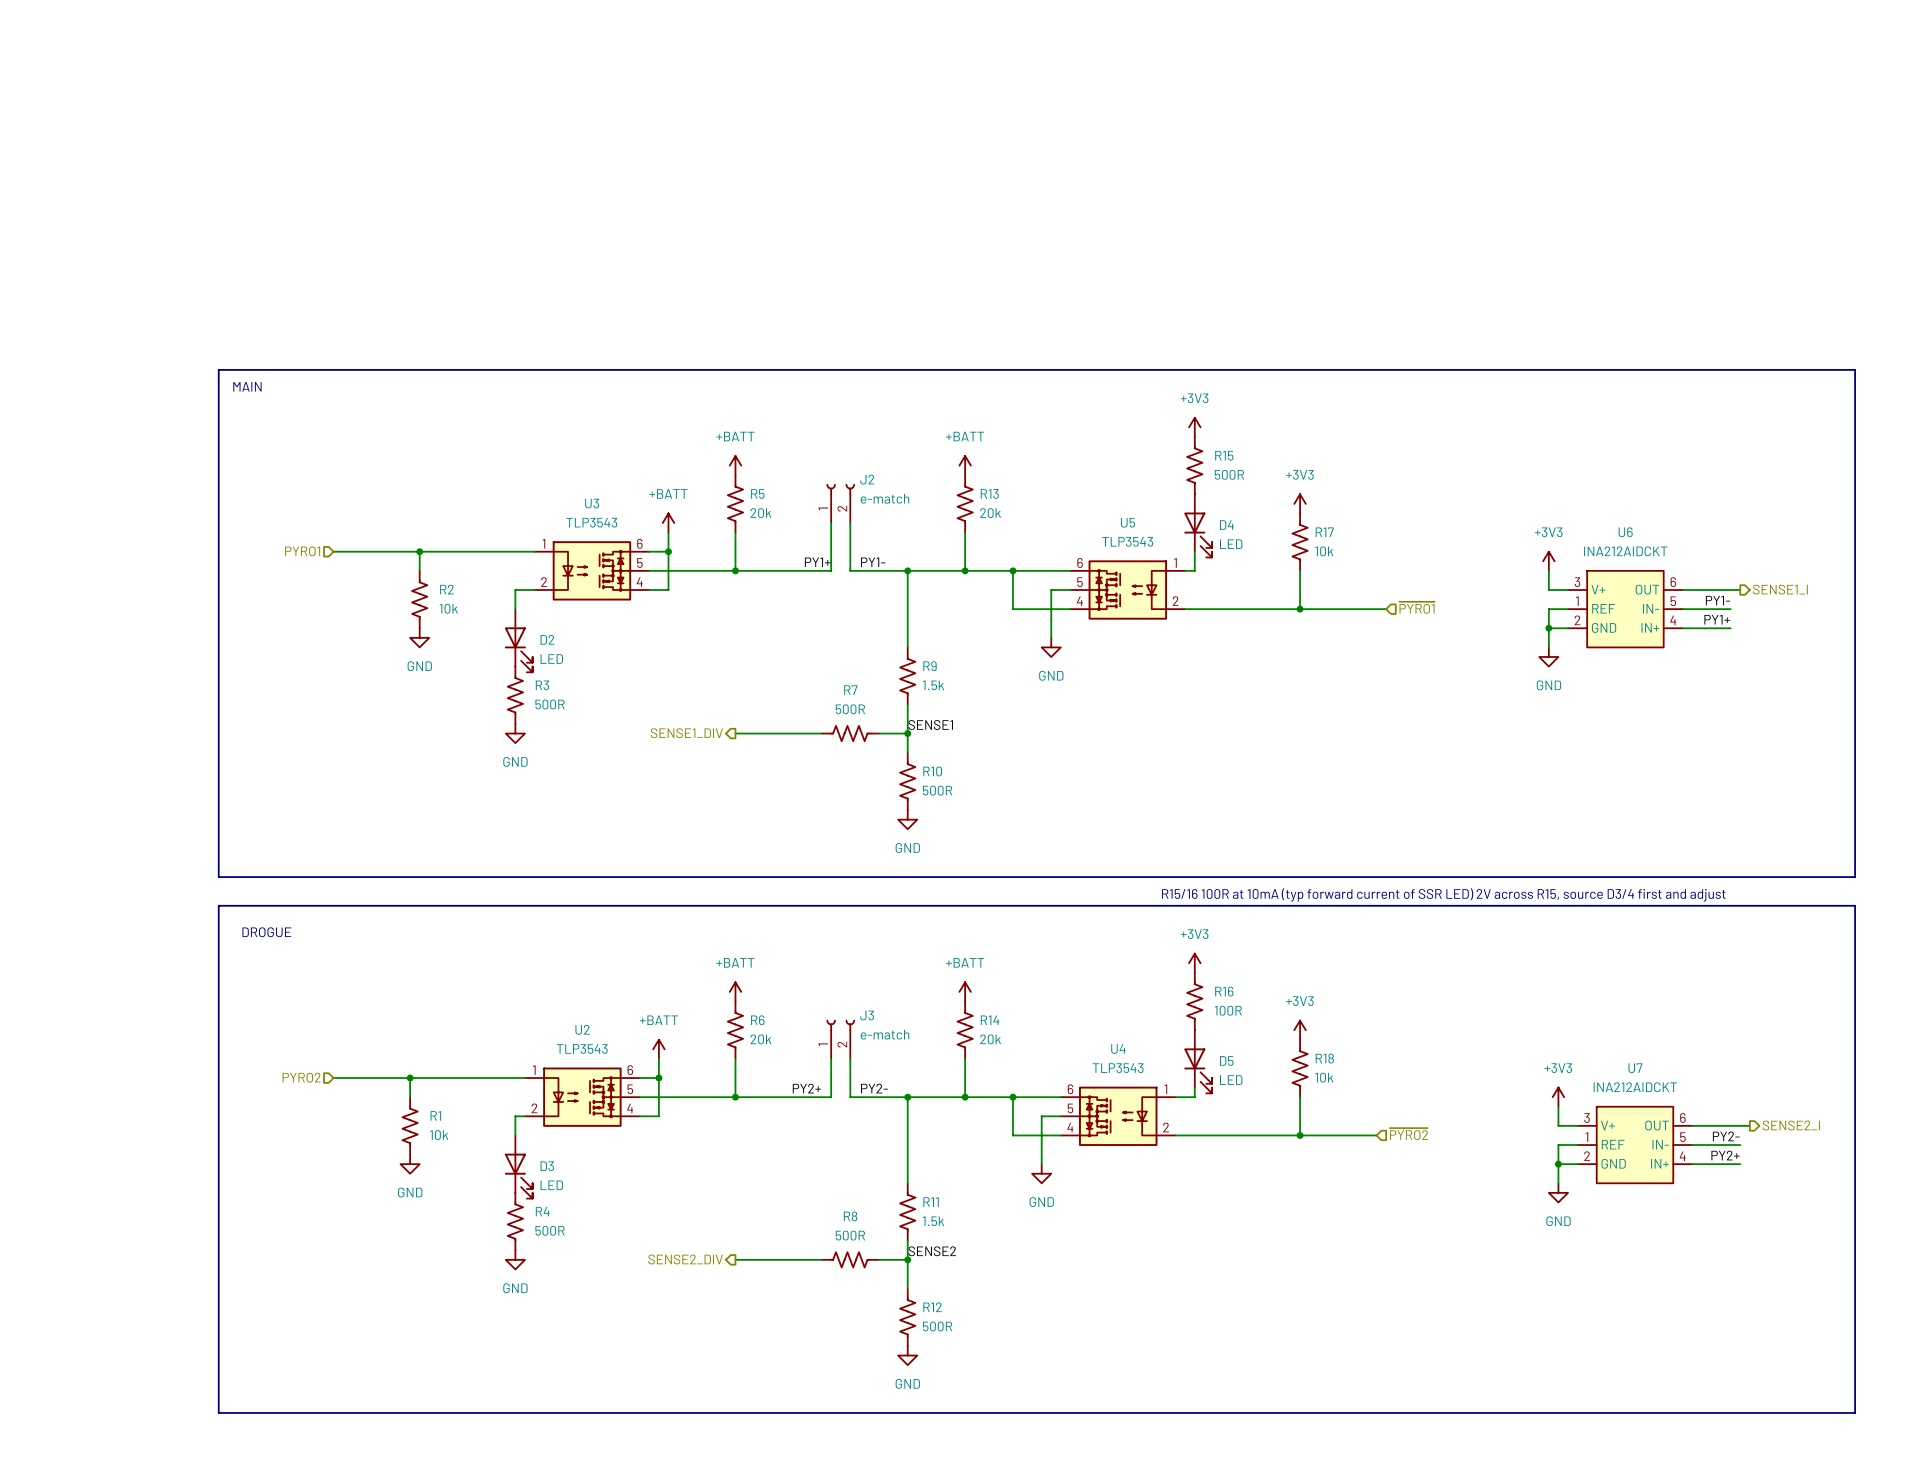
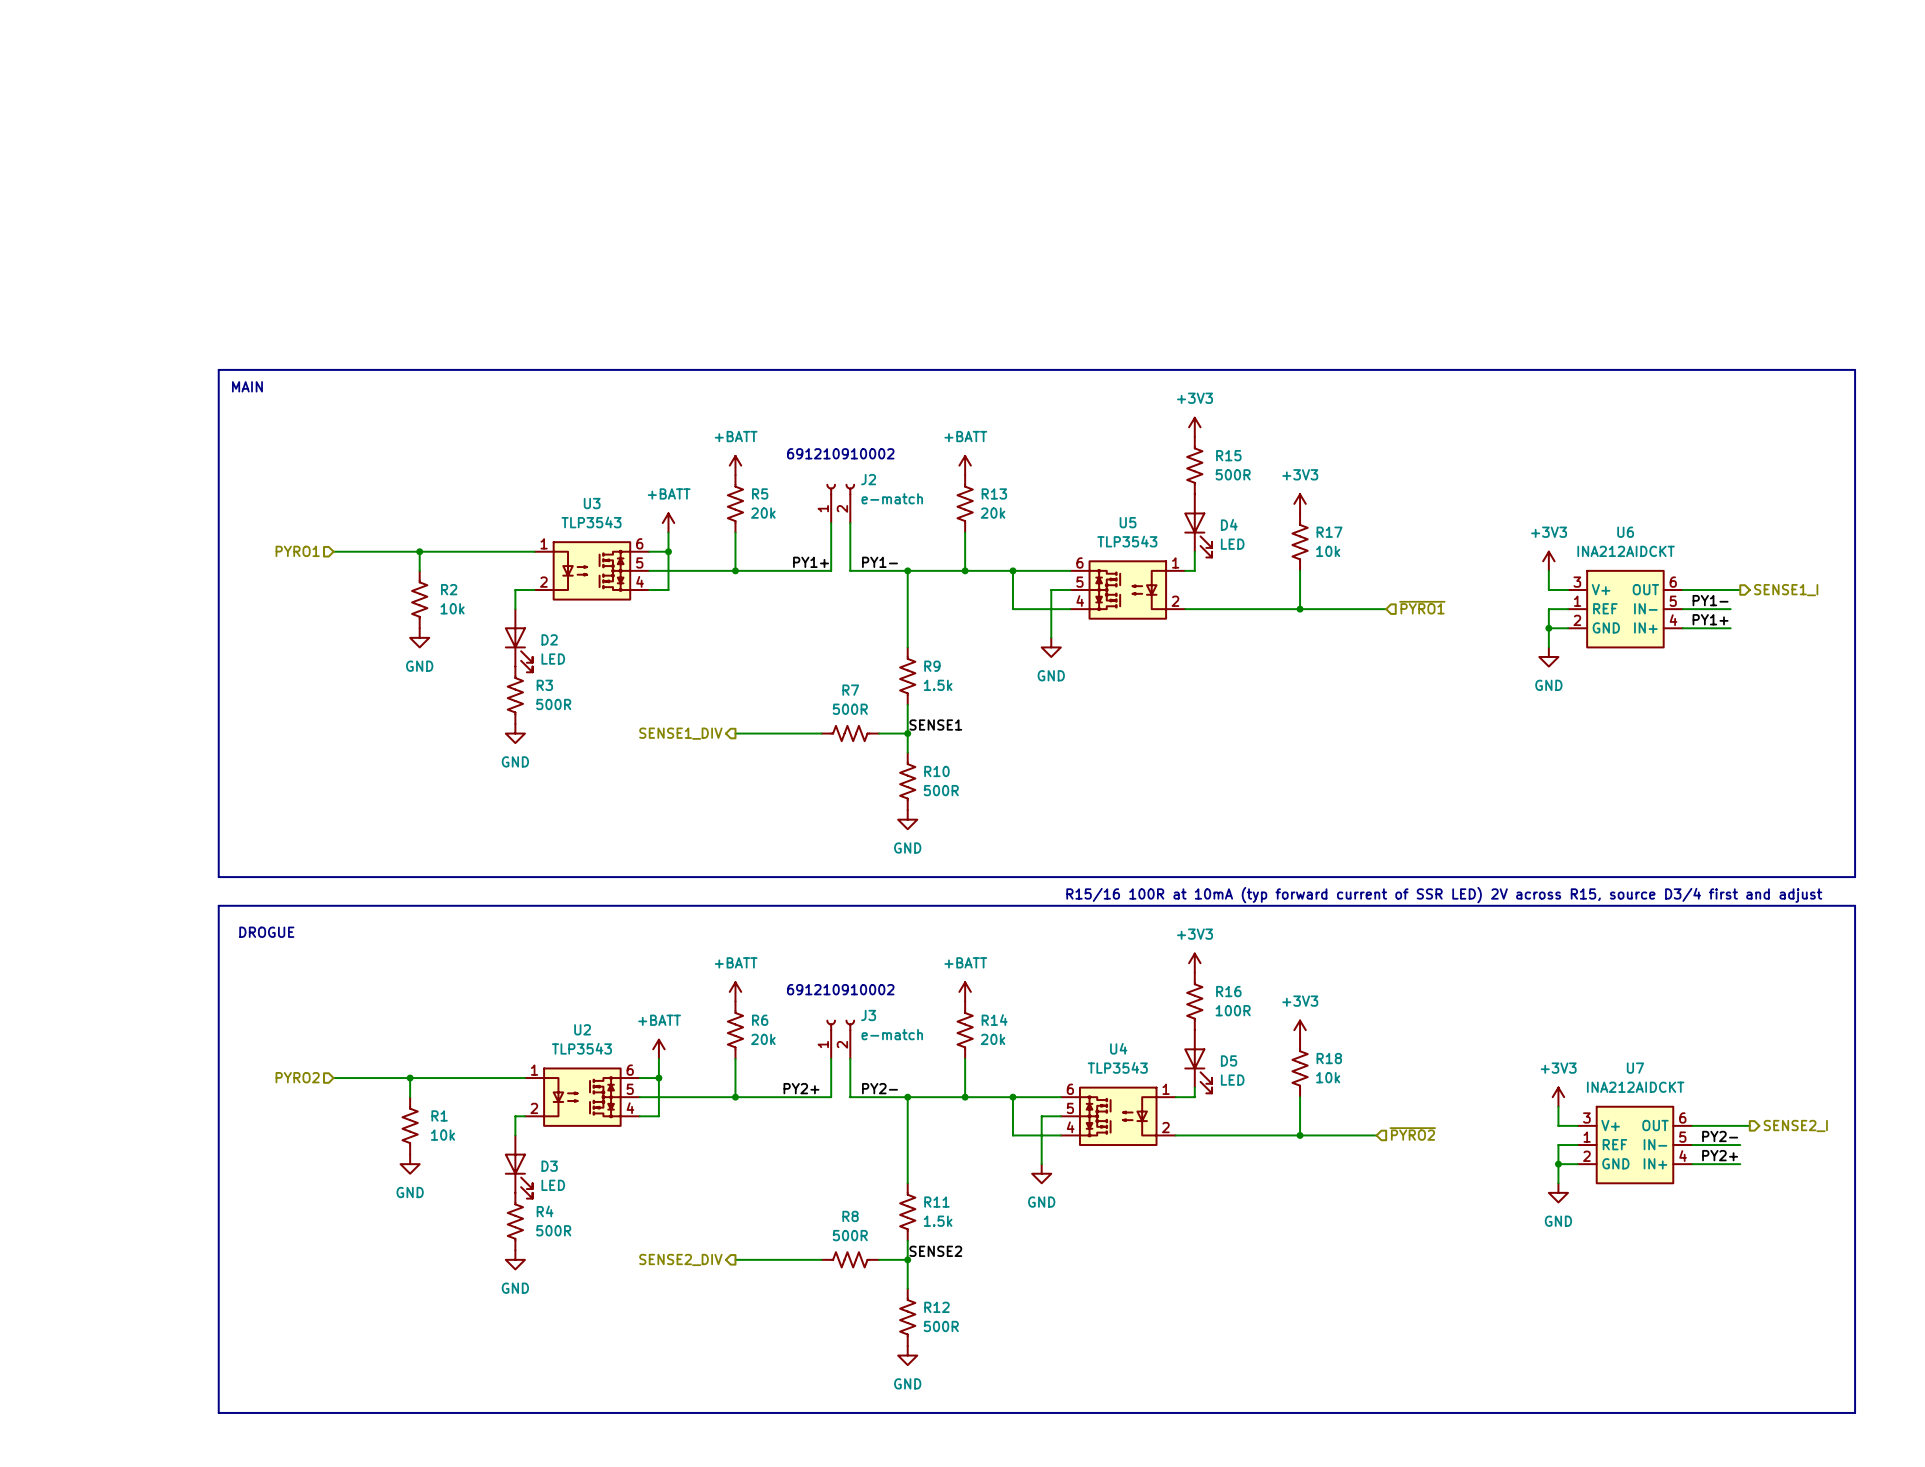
text: none -> 691210910002 (840, 453)
text: none -> 691210910002 (840, 989)

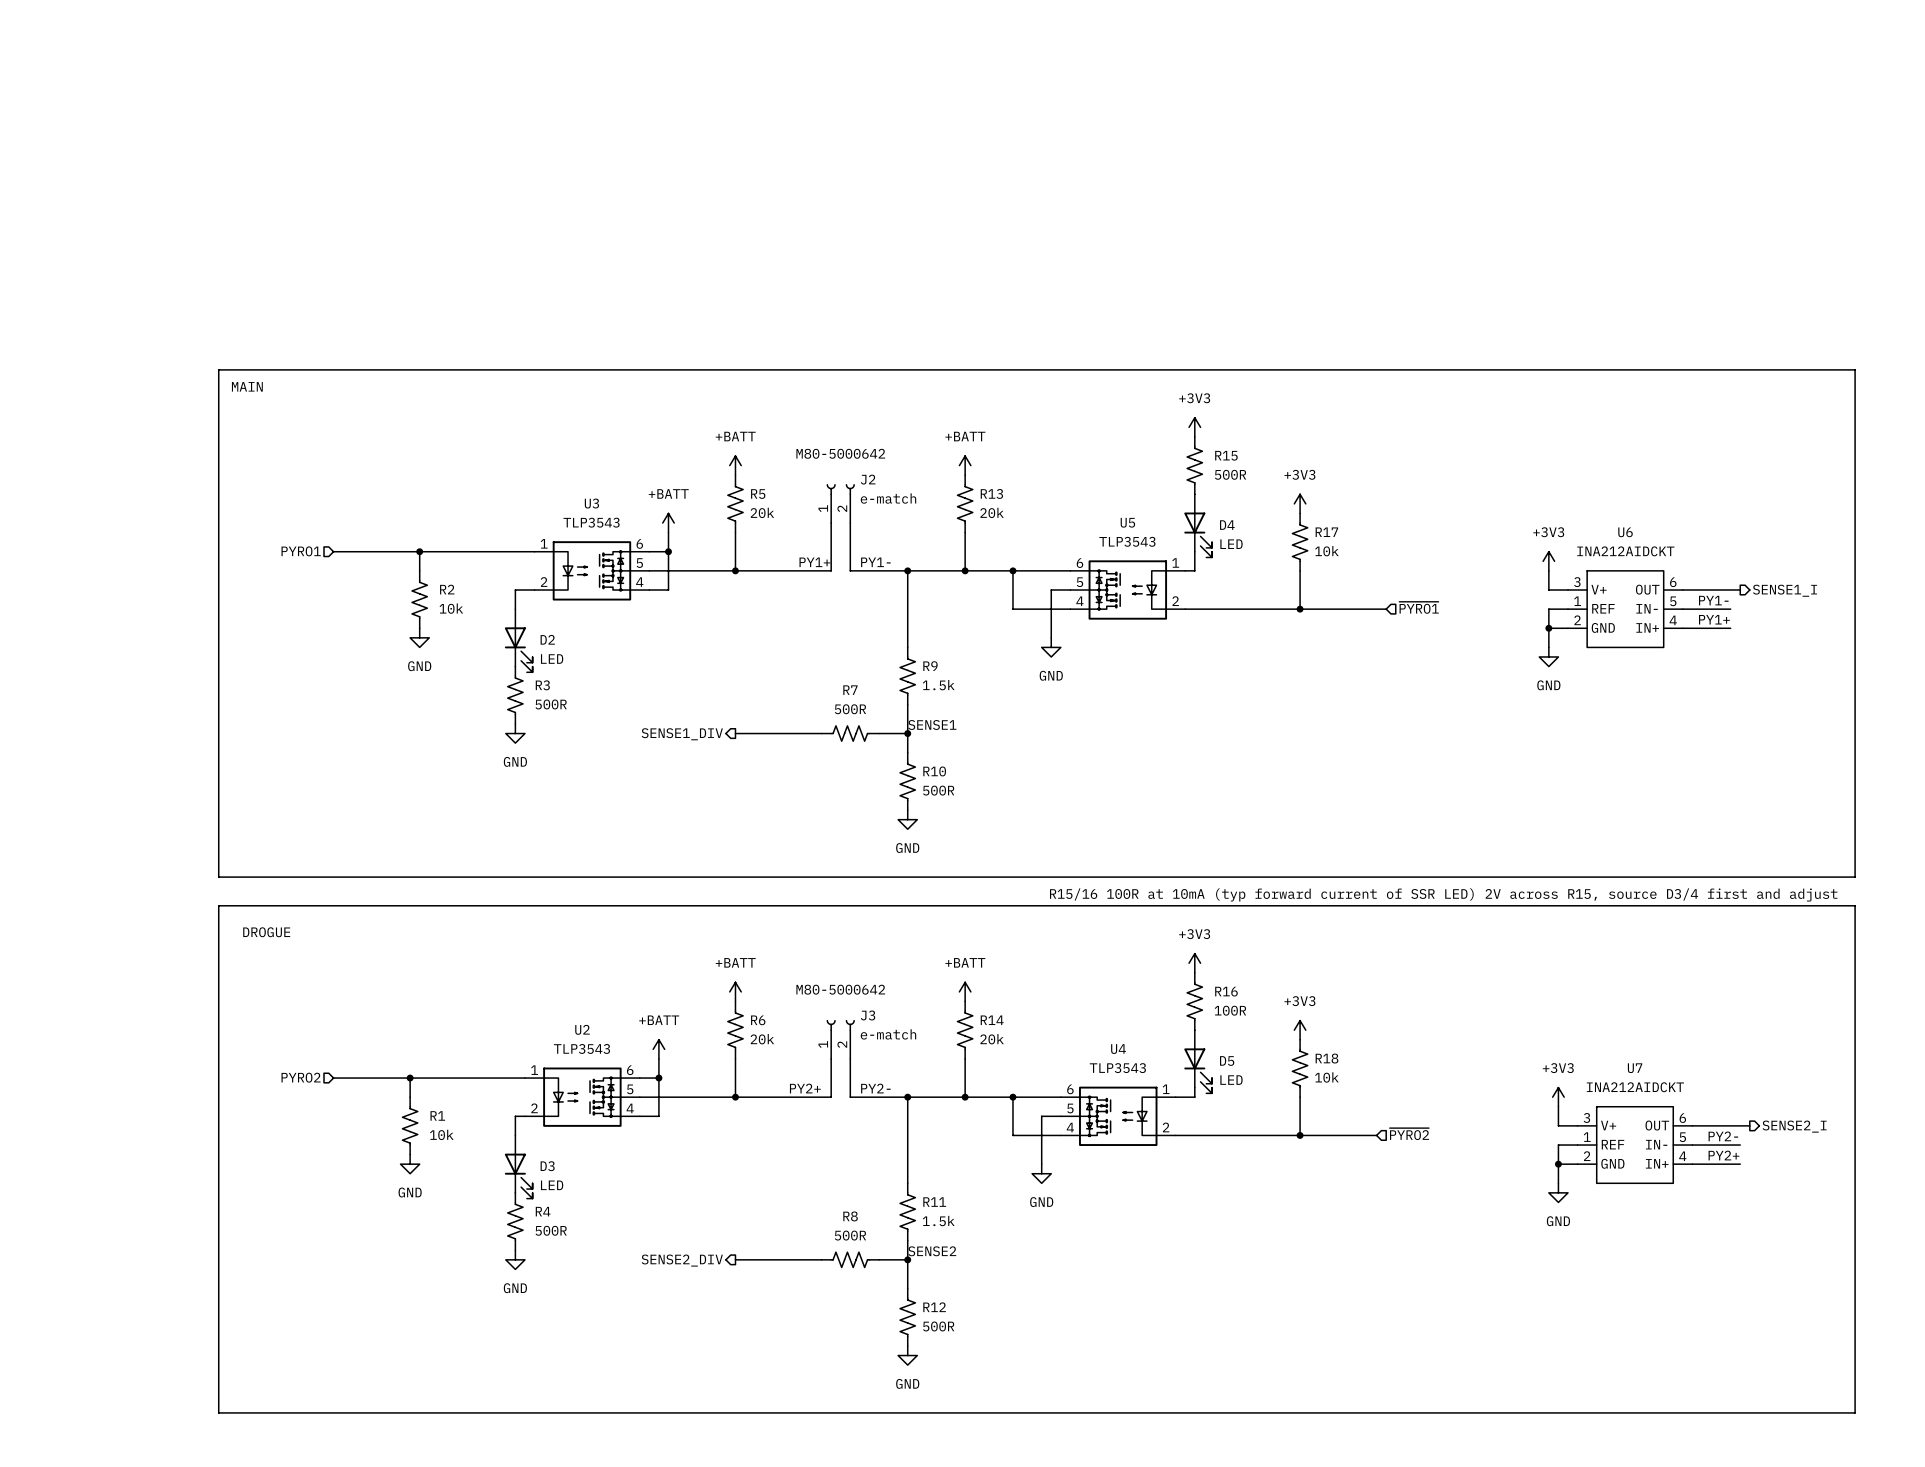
text: 691210910002 (840, 453) -> M80-5000642 (840, 453)
text: 691210910002 (840, 989) -> M80-5000642 (840, 989)

